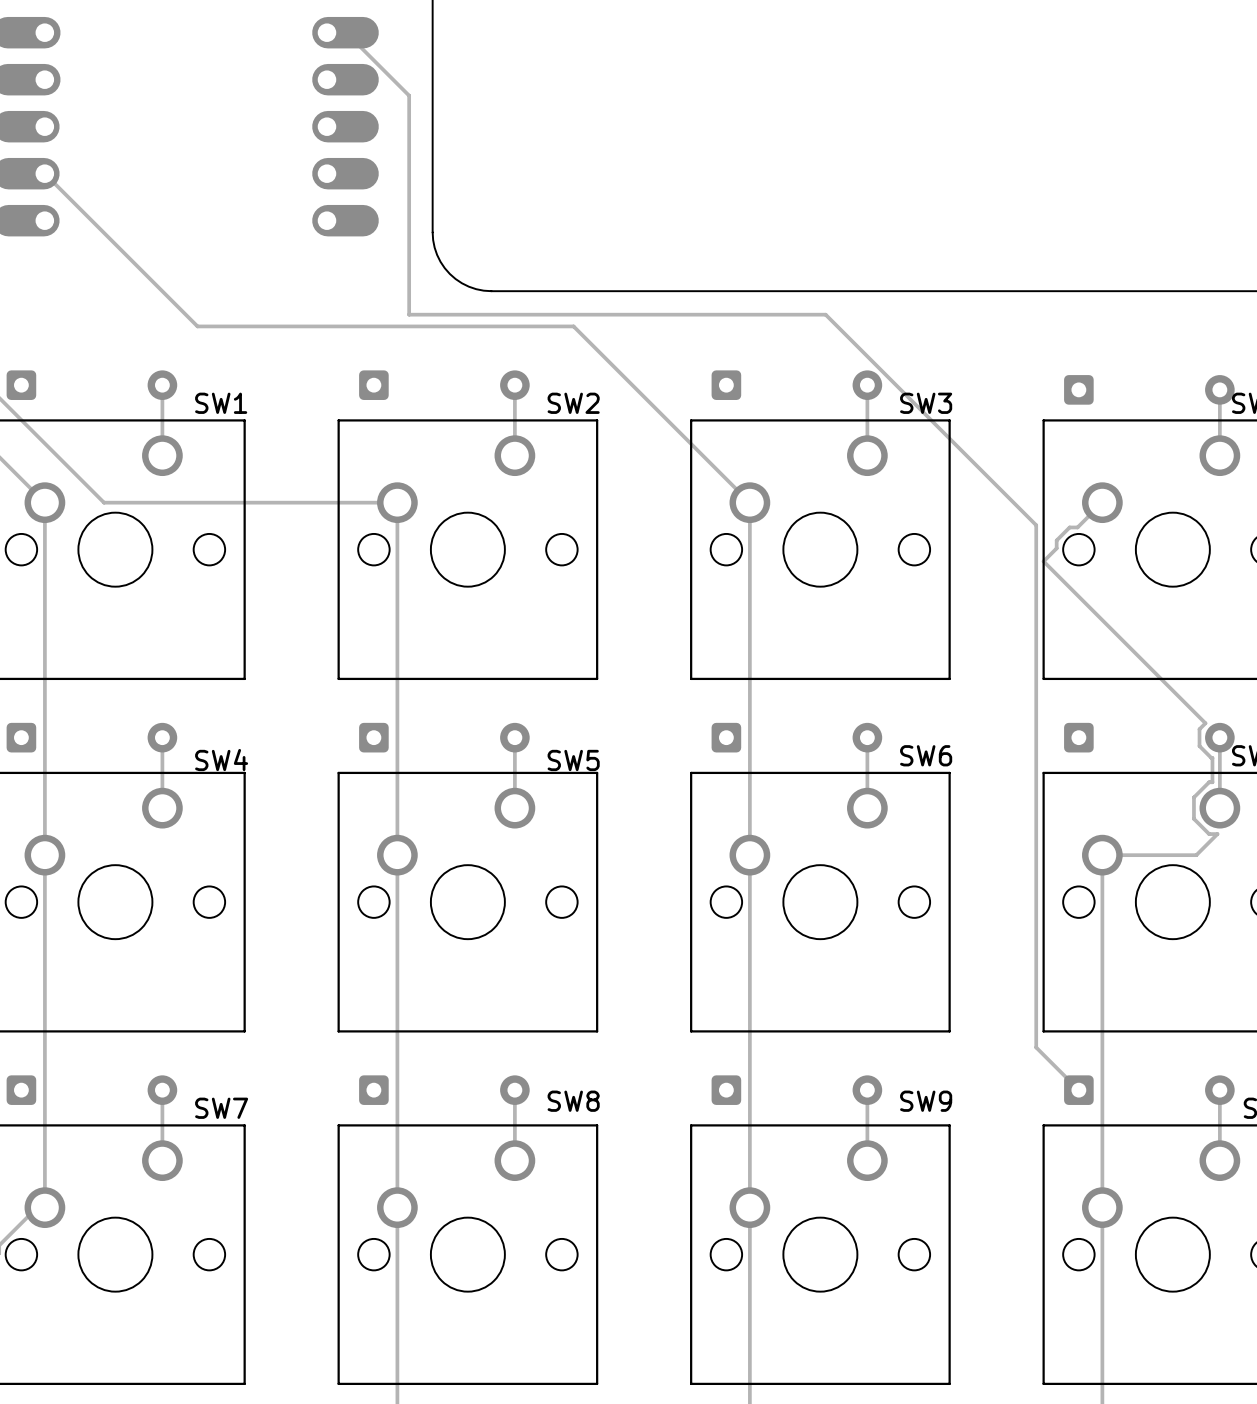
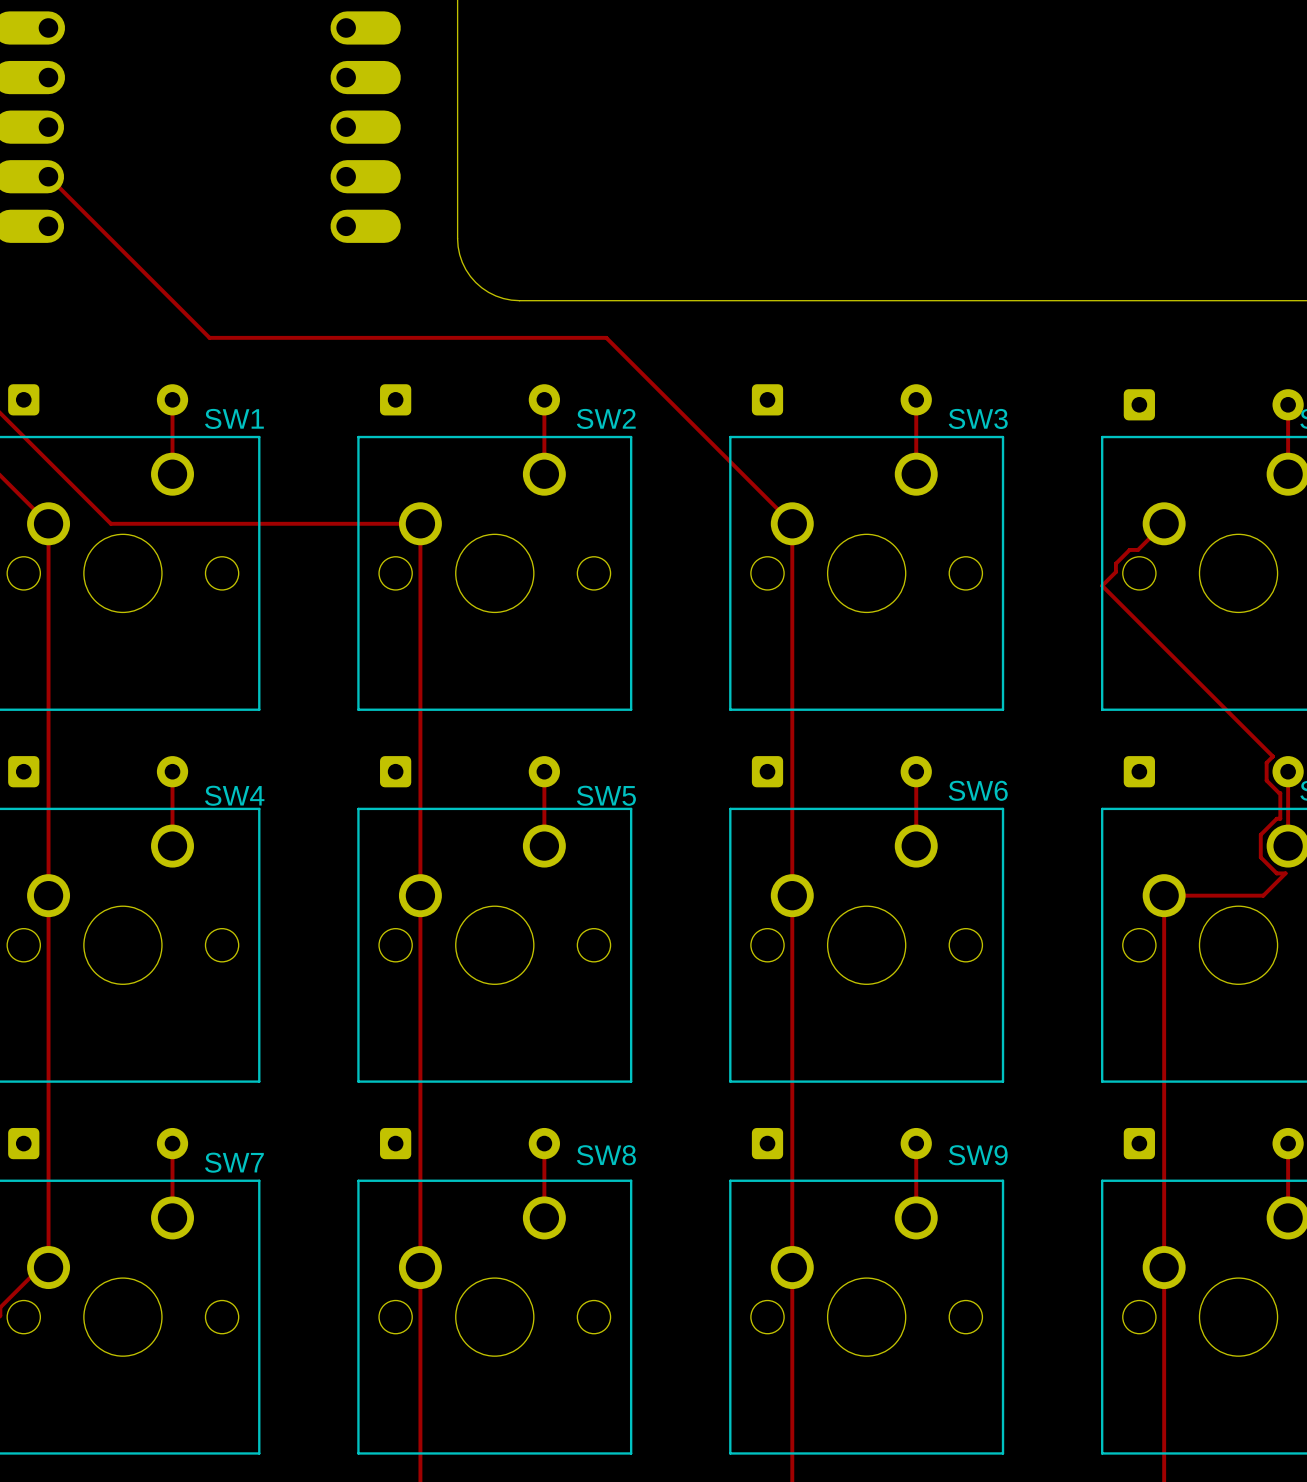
track: (326, 32) (346, 32) (409, 95) (409, 314) (825, 314) (1036, 525) (1036, 1047) (1078, 1090) -> none

